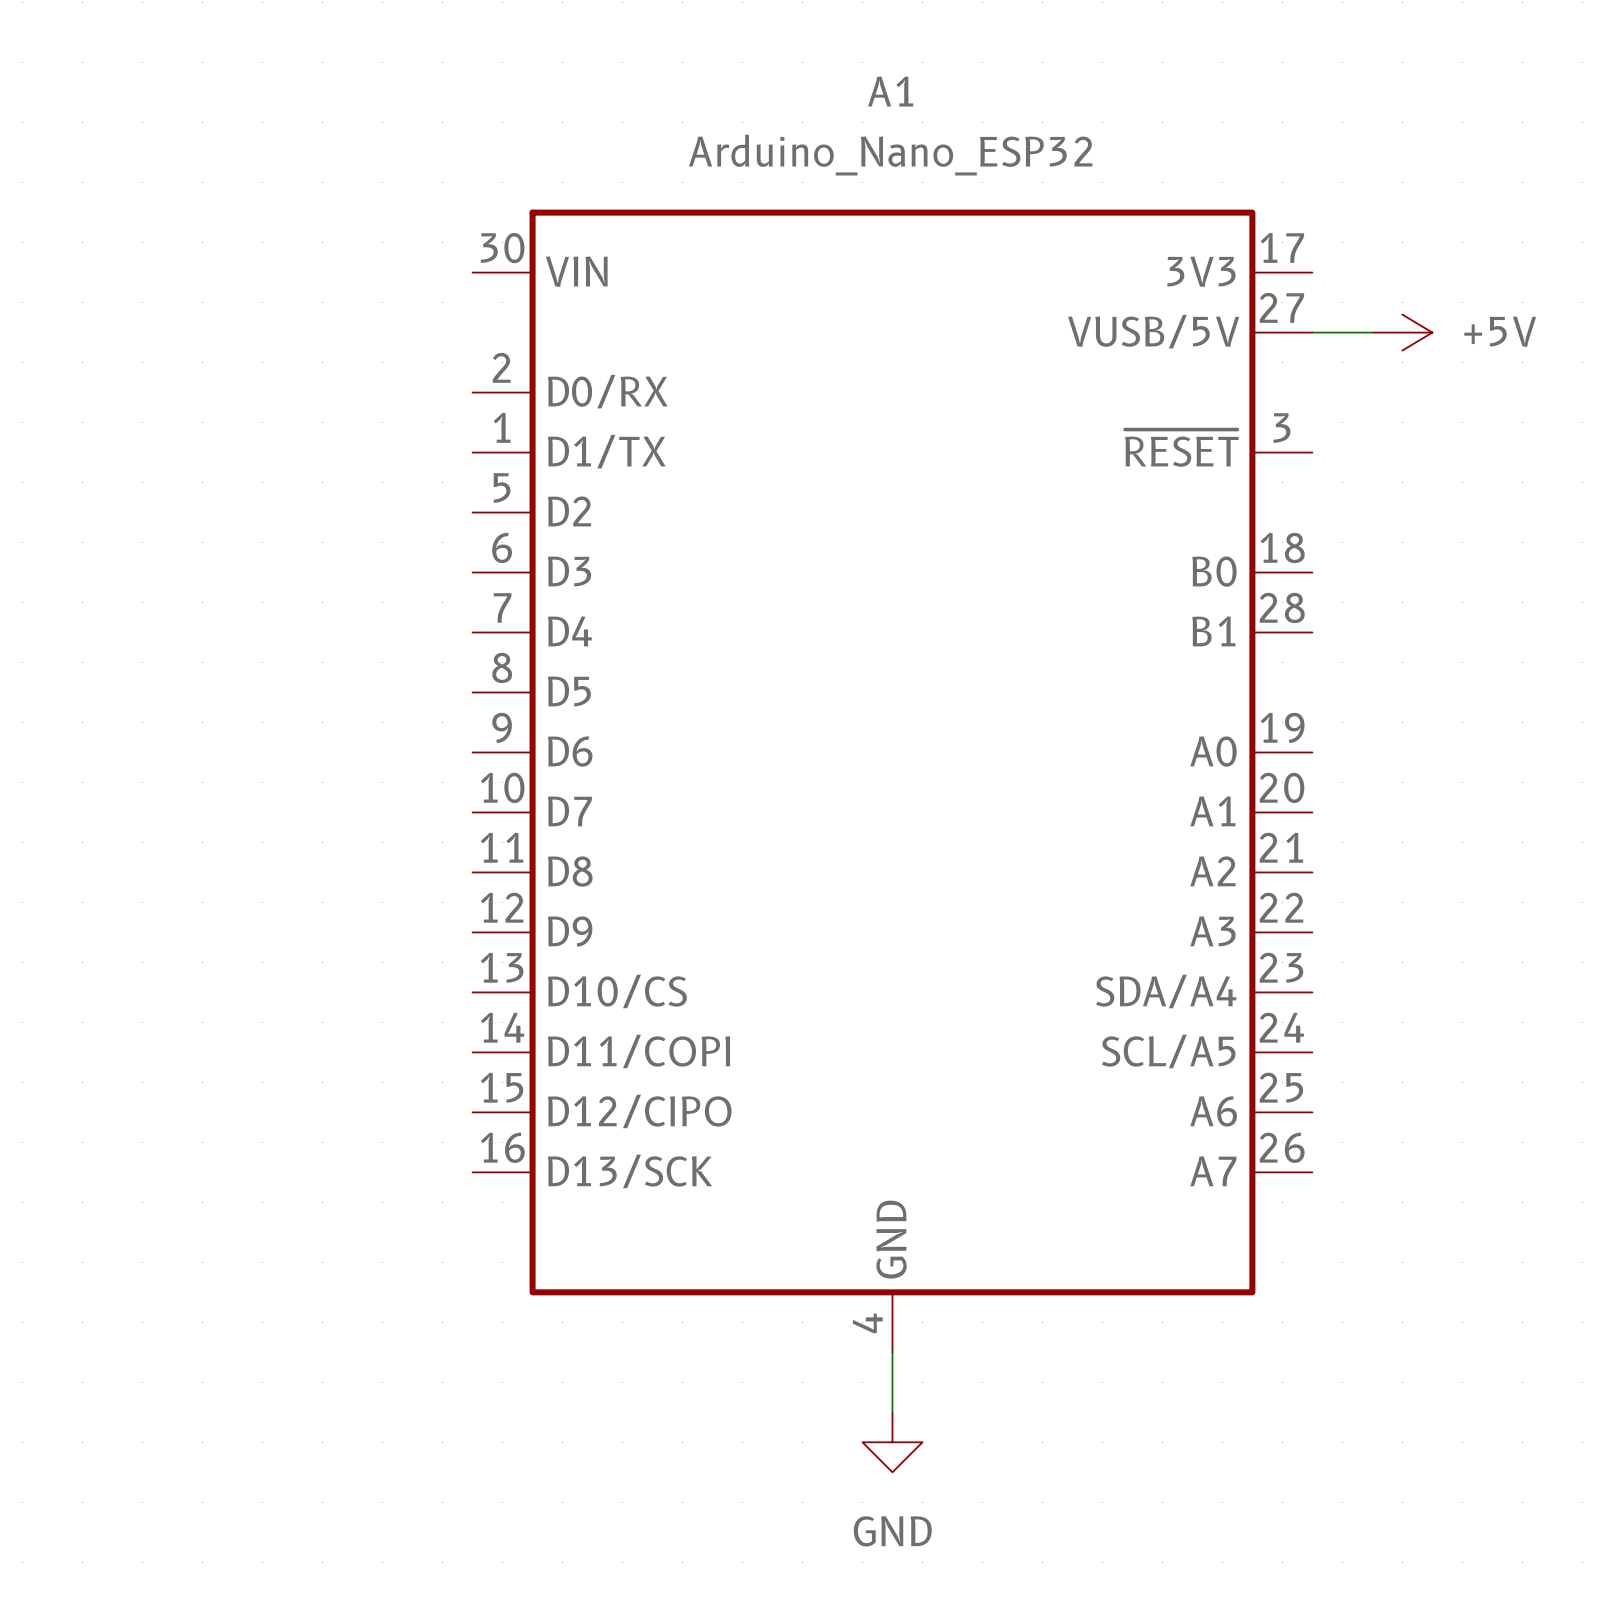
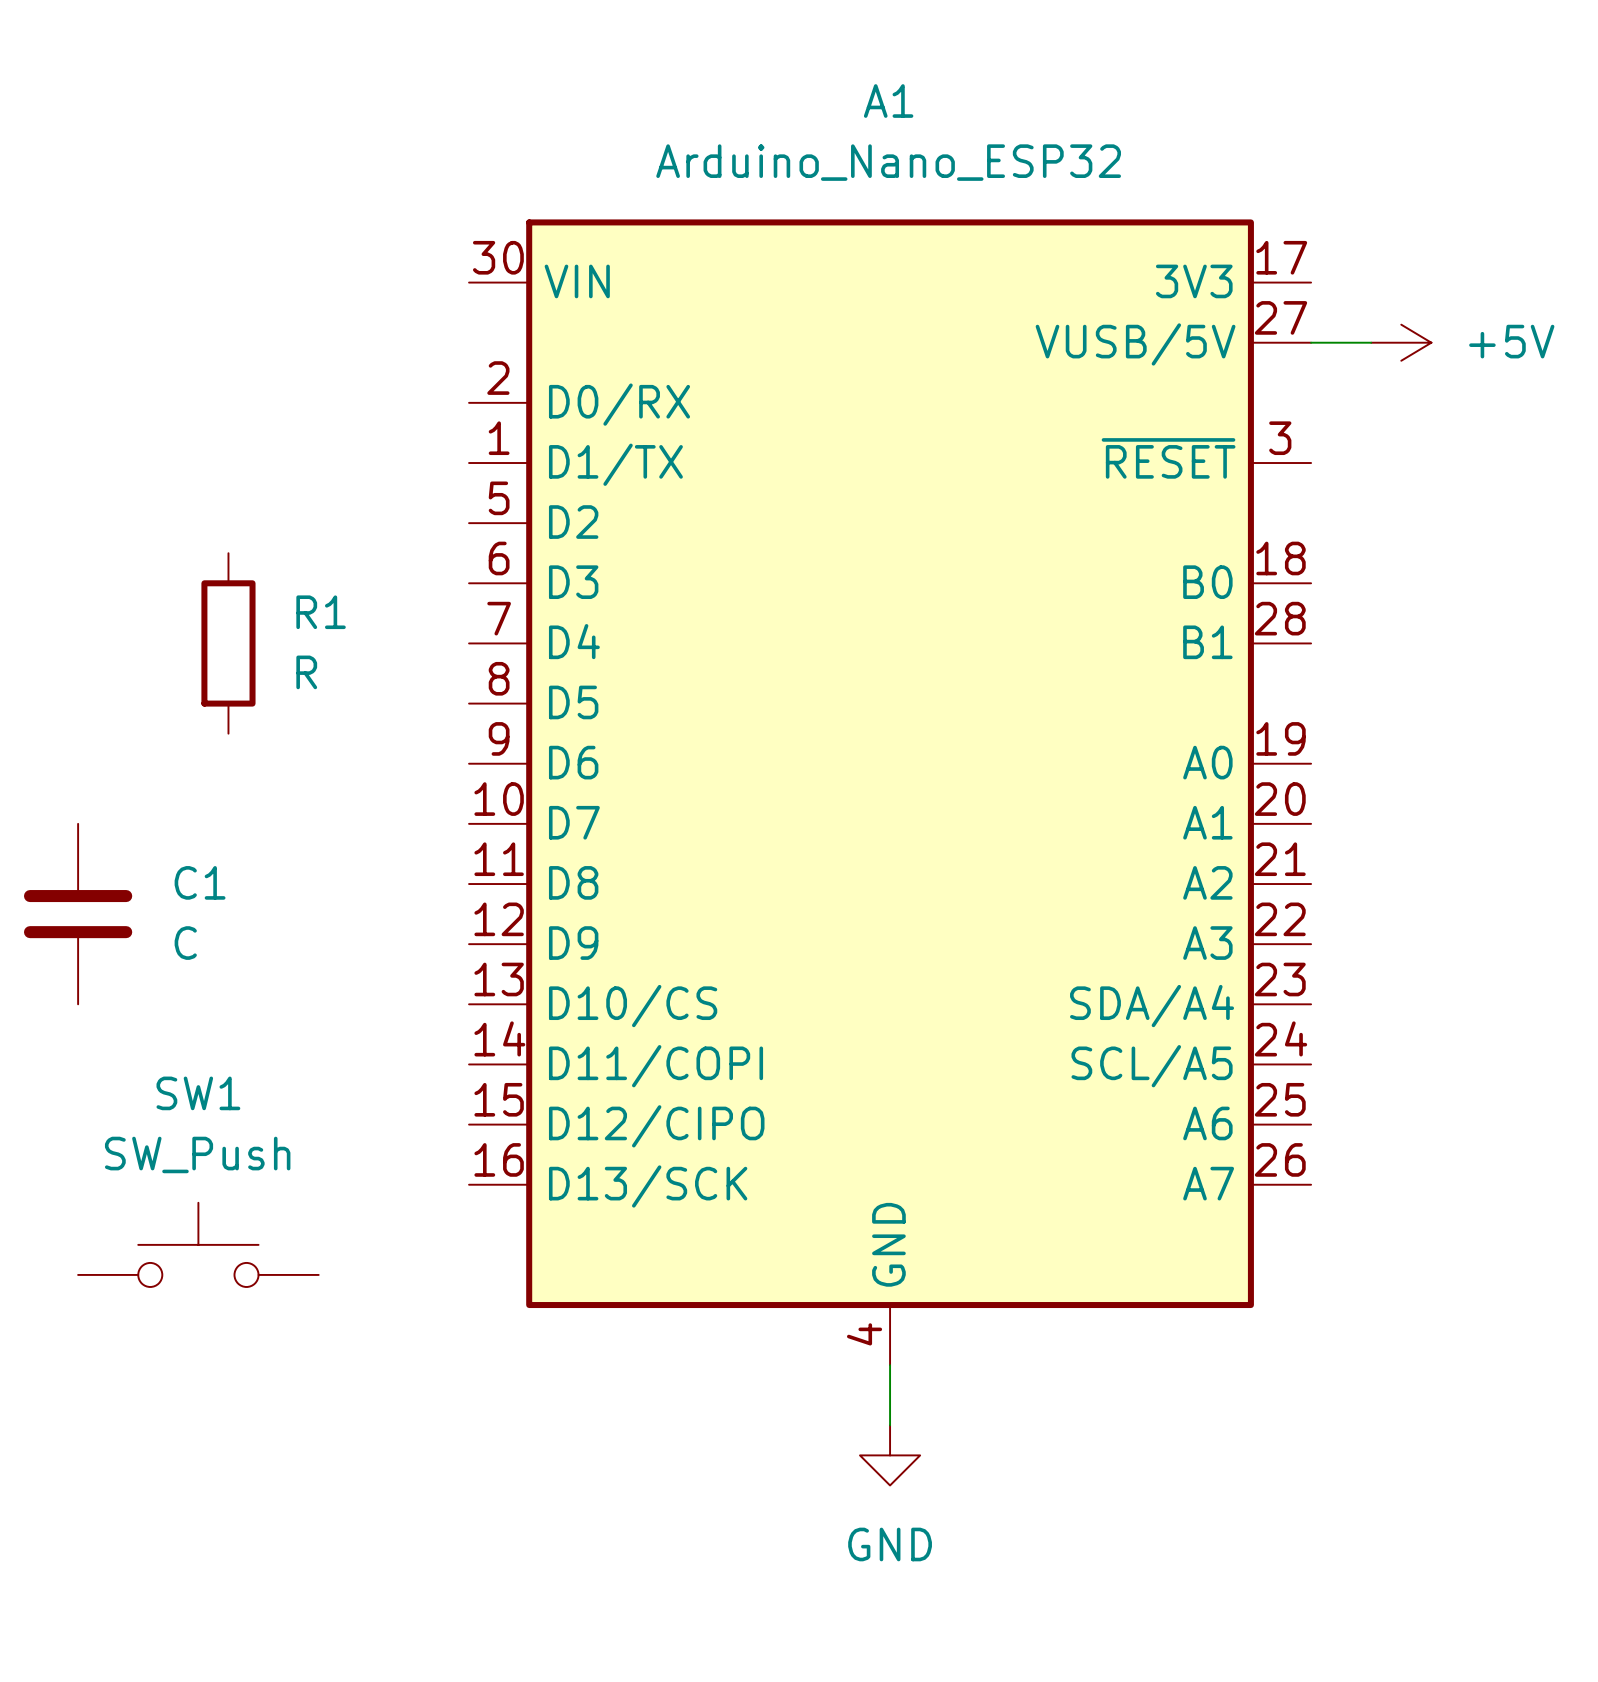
R1: none -> R (228, 643)
C1: none -> C (78, 914)
SW1: none -> SW_Push (198, 1244)

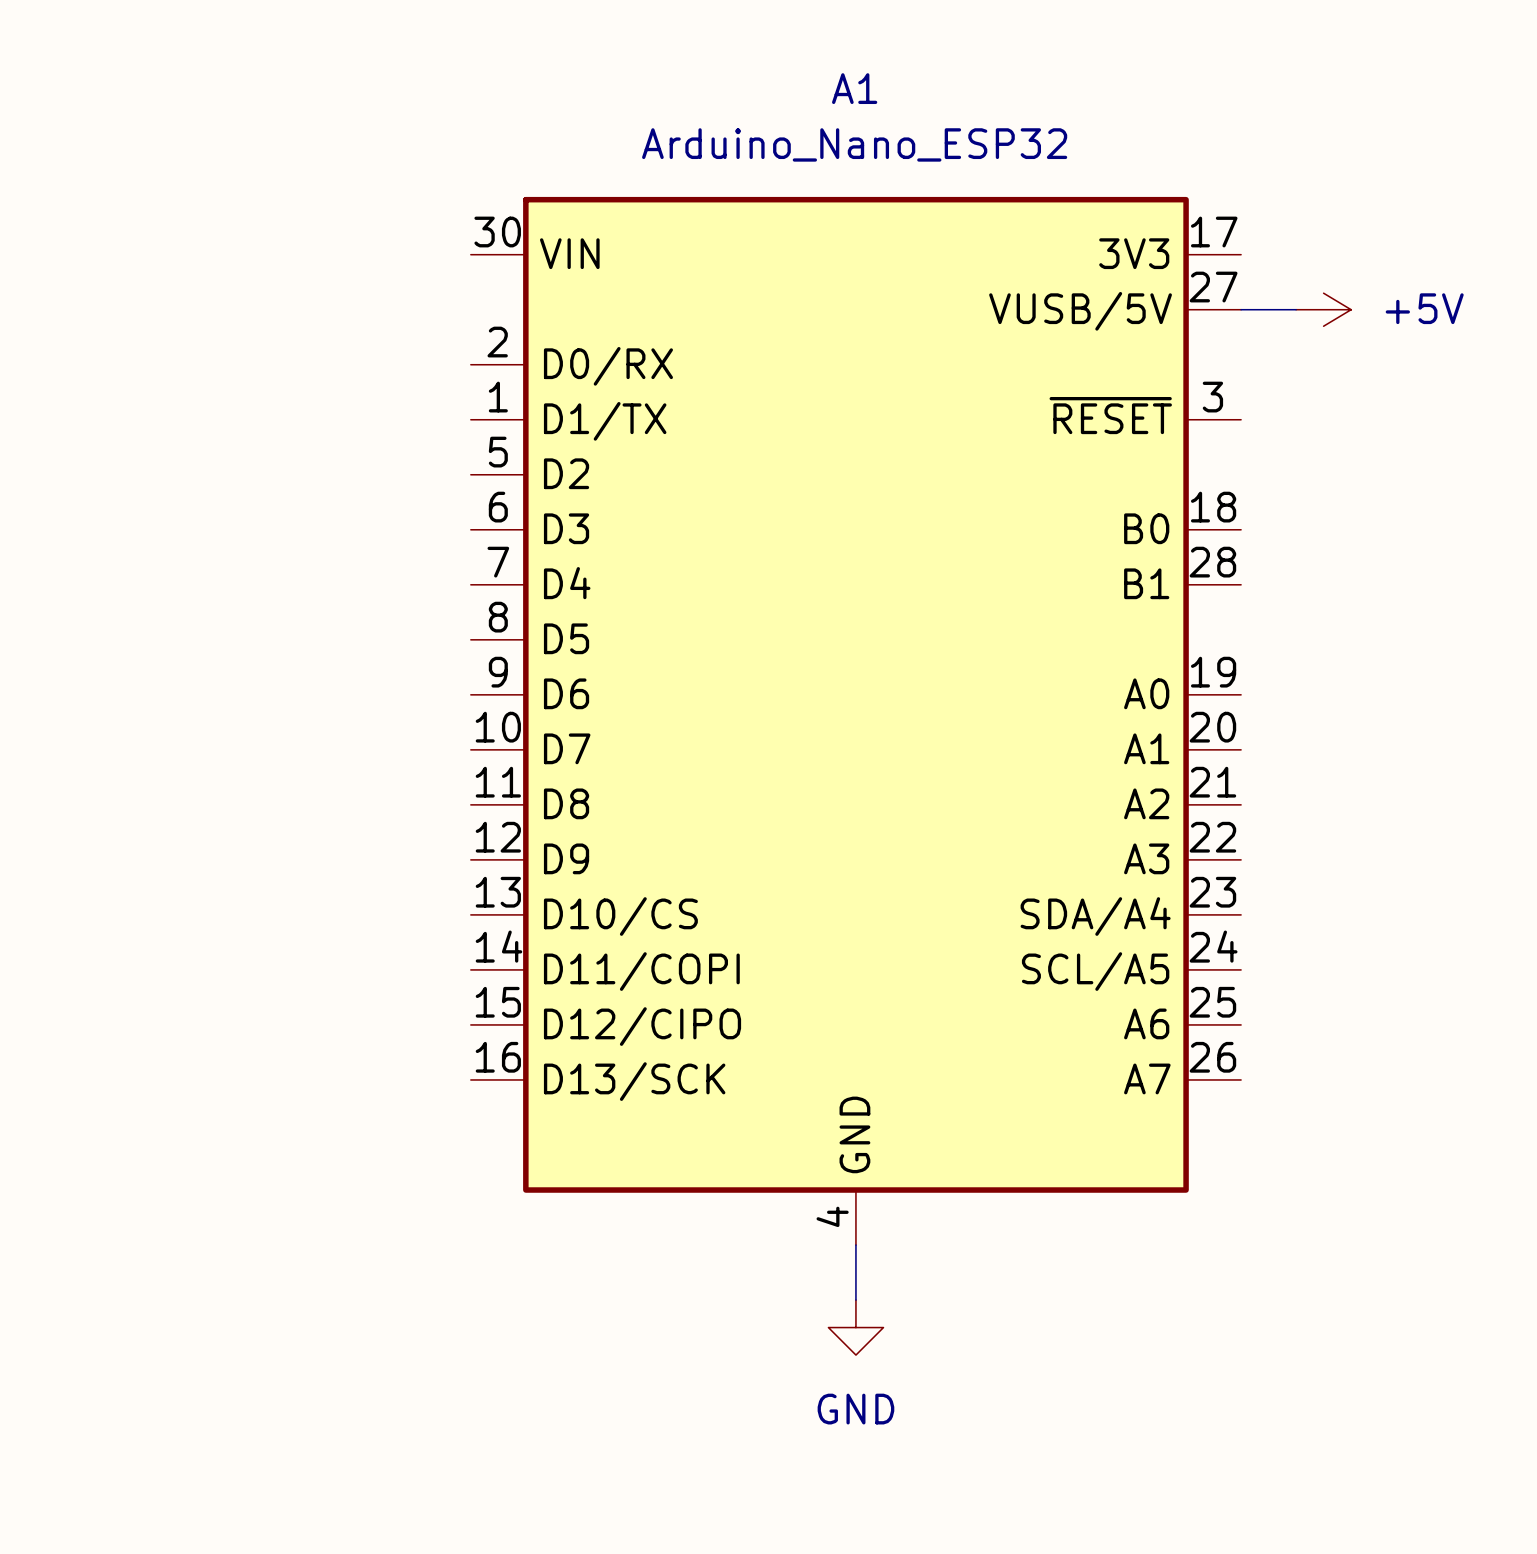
R1: R (228, 643) -> none
C1: C (78, 914) -> none
SW1: SW_Push (198, 1244) -> none

